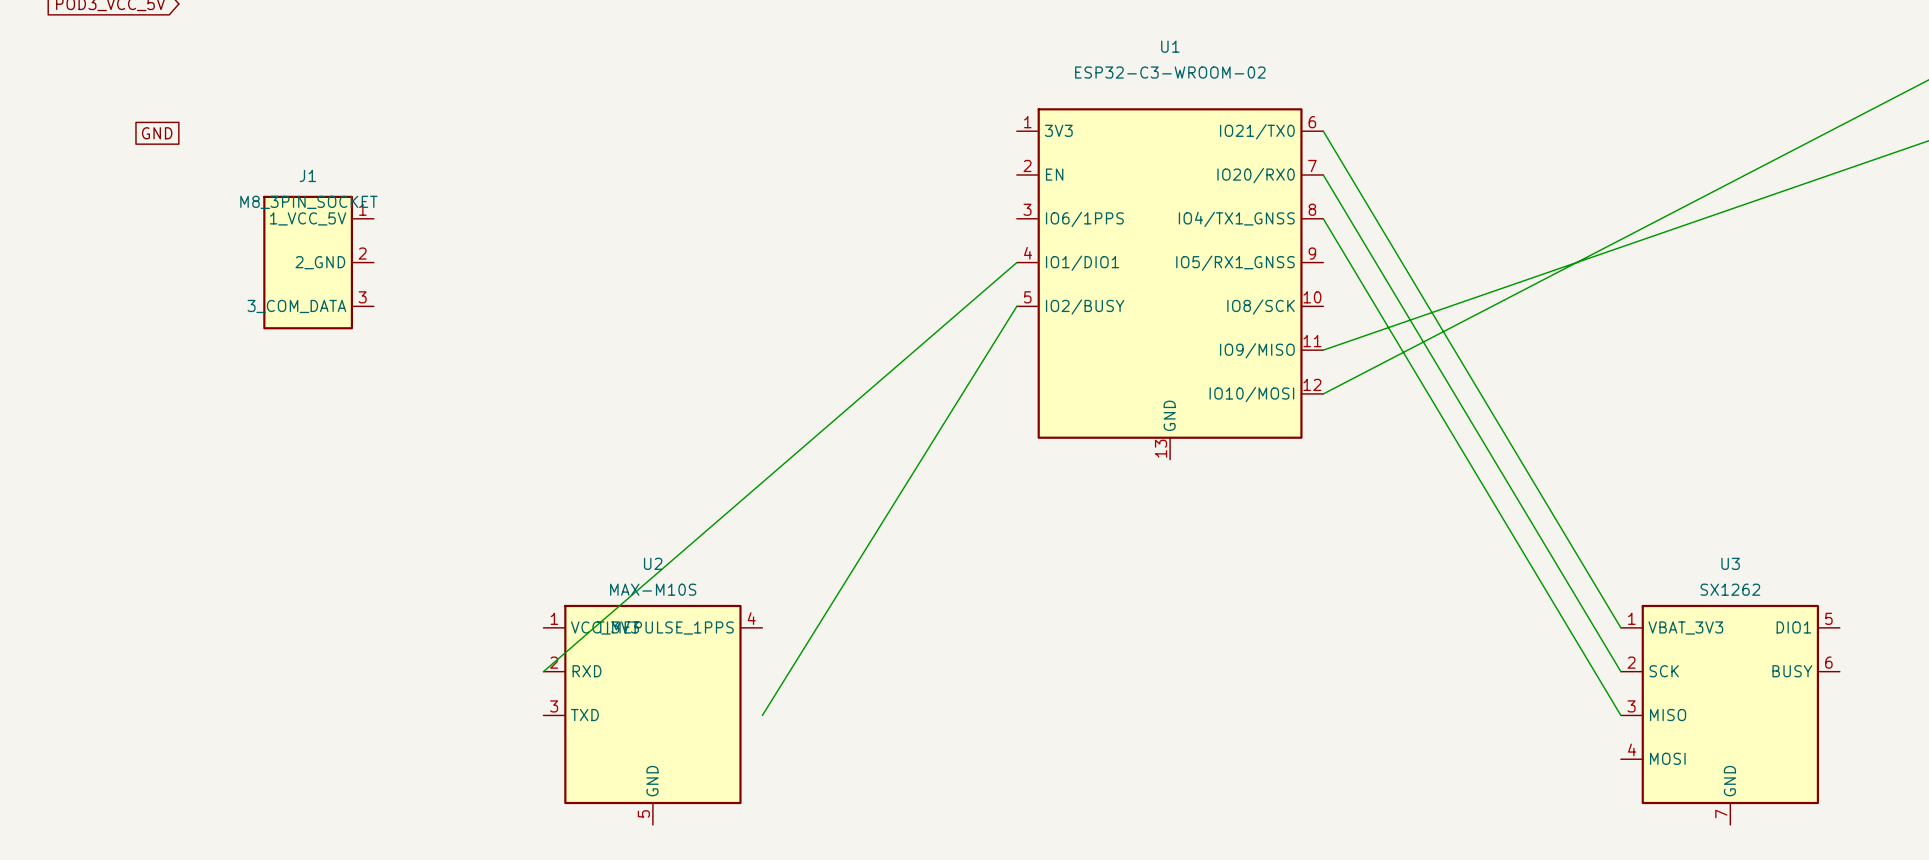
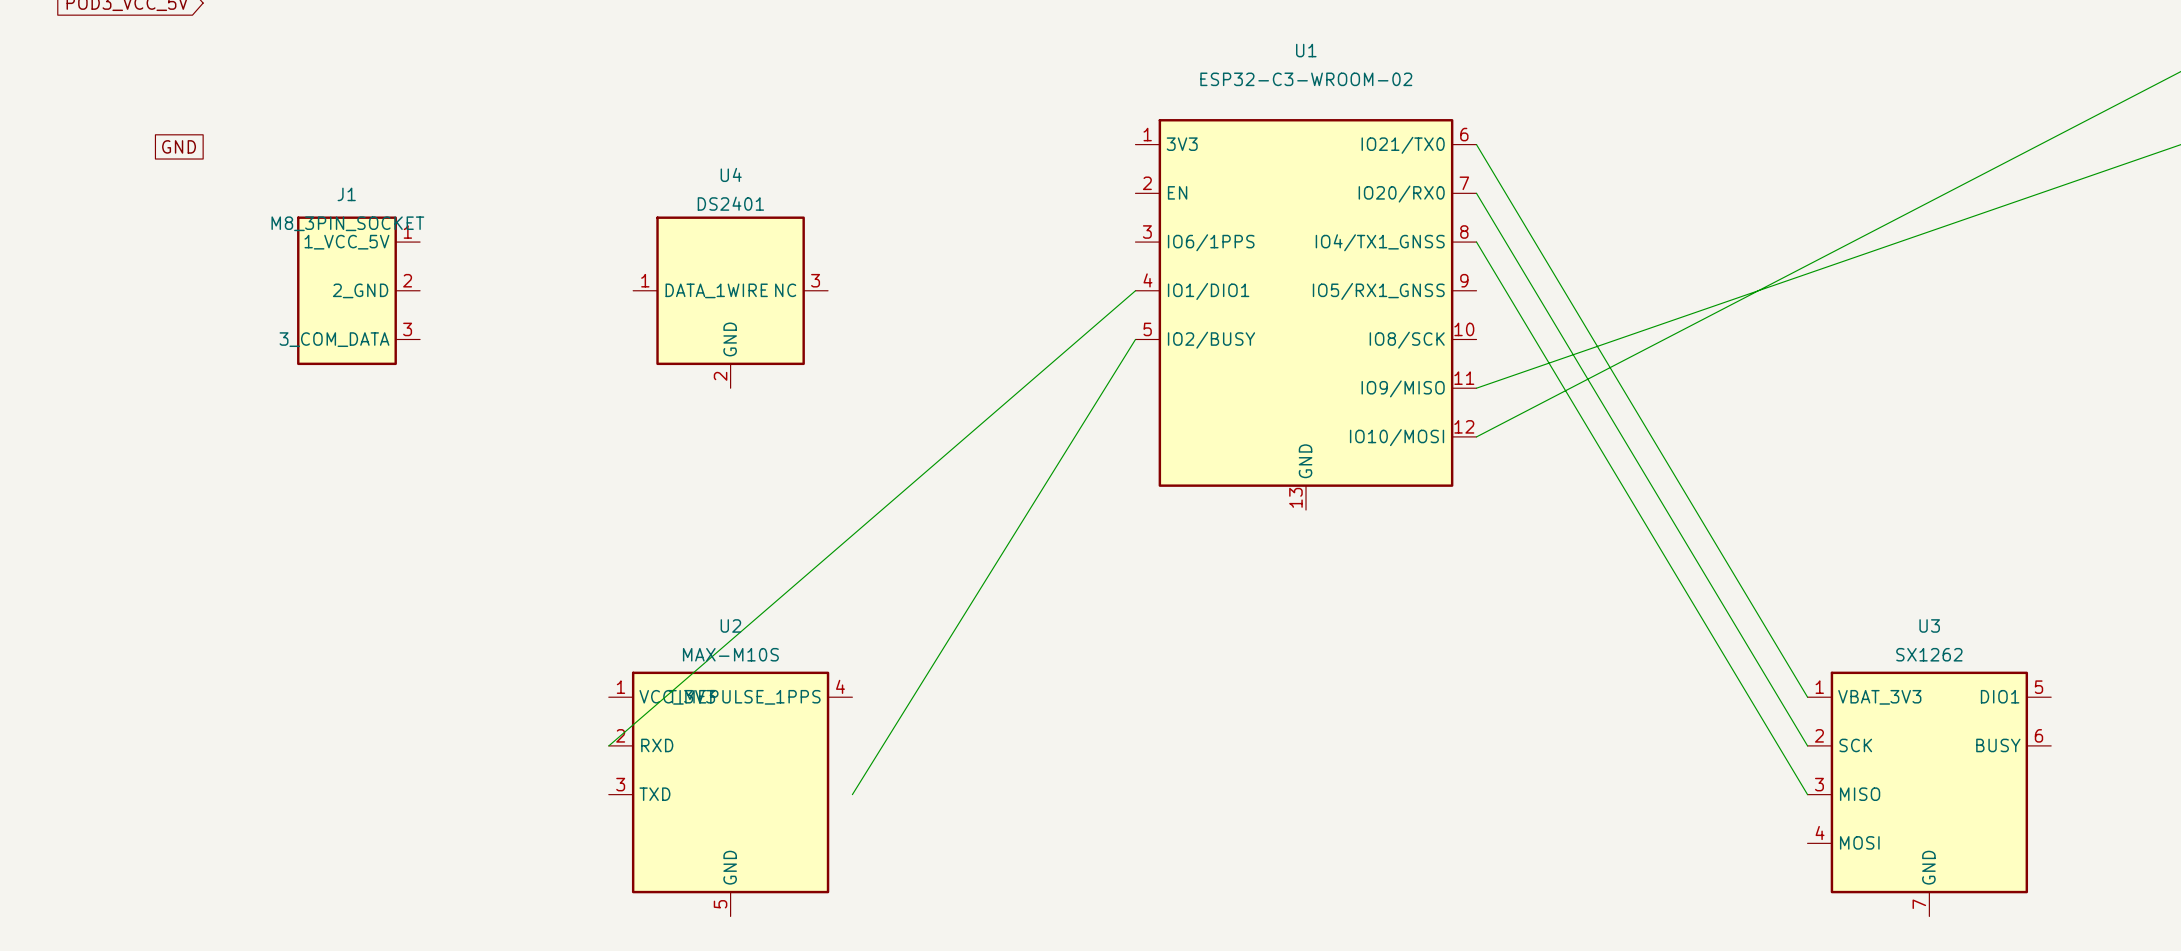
U4: none -> DS2401 (730, 302)

